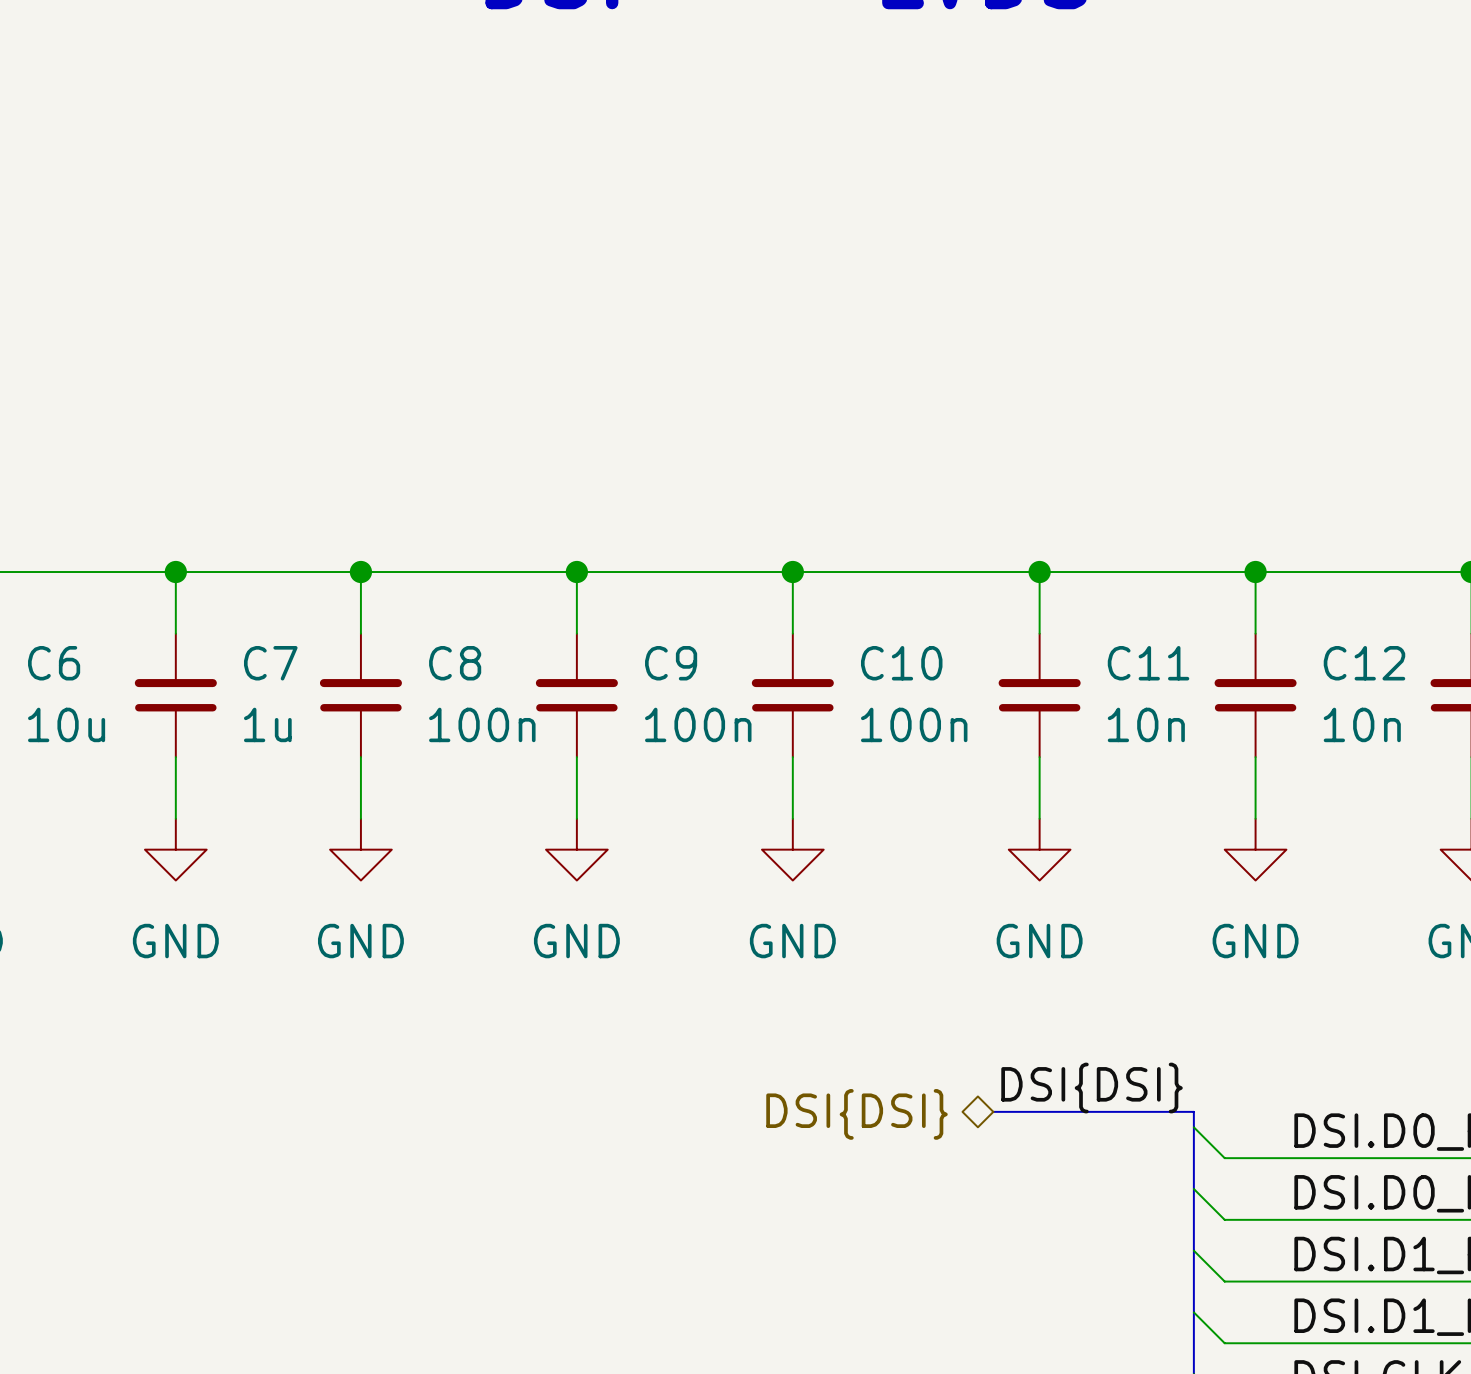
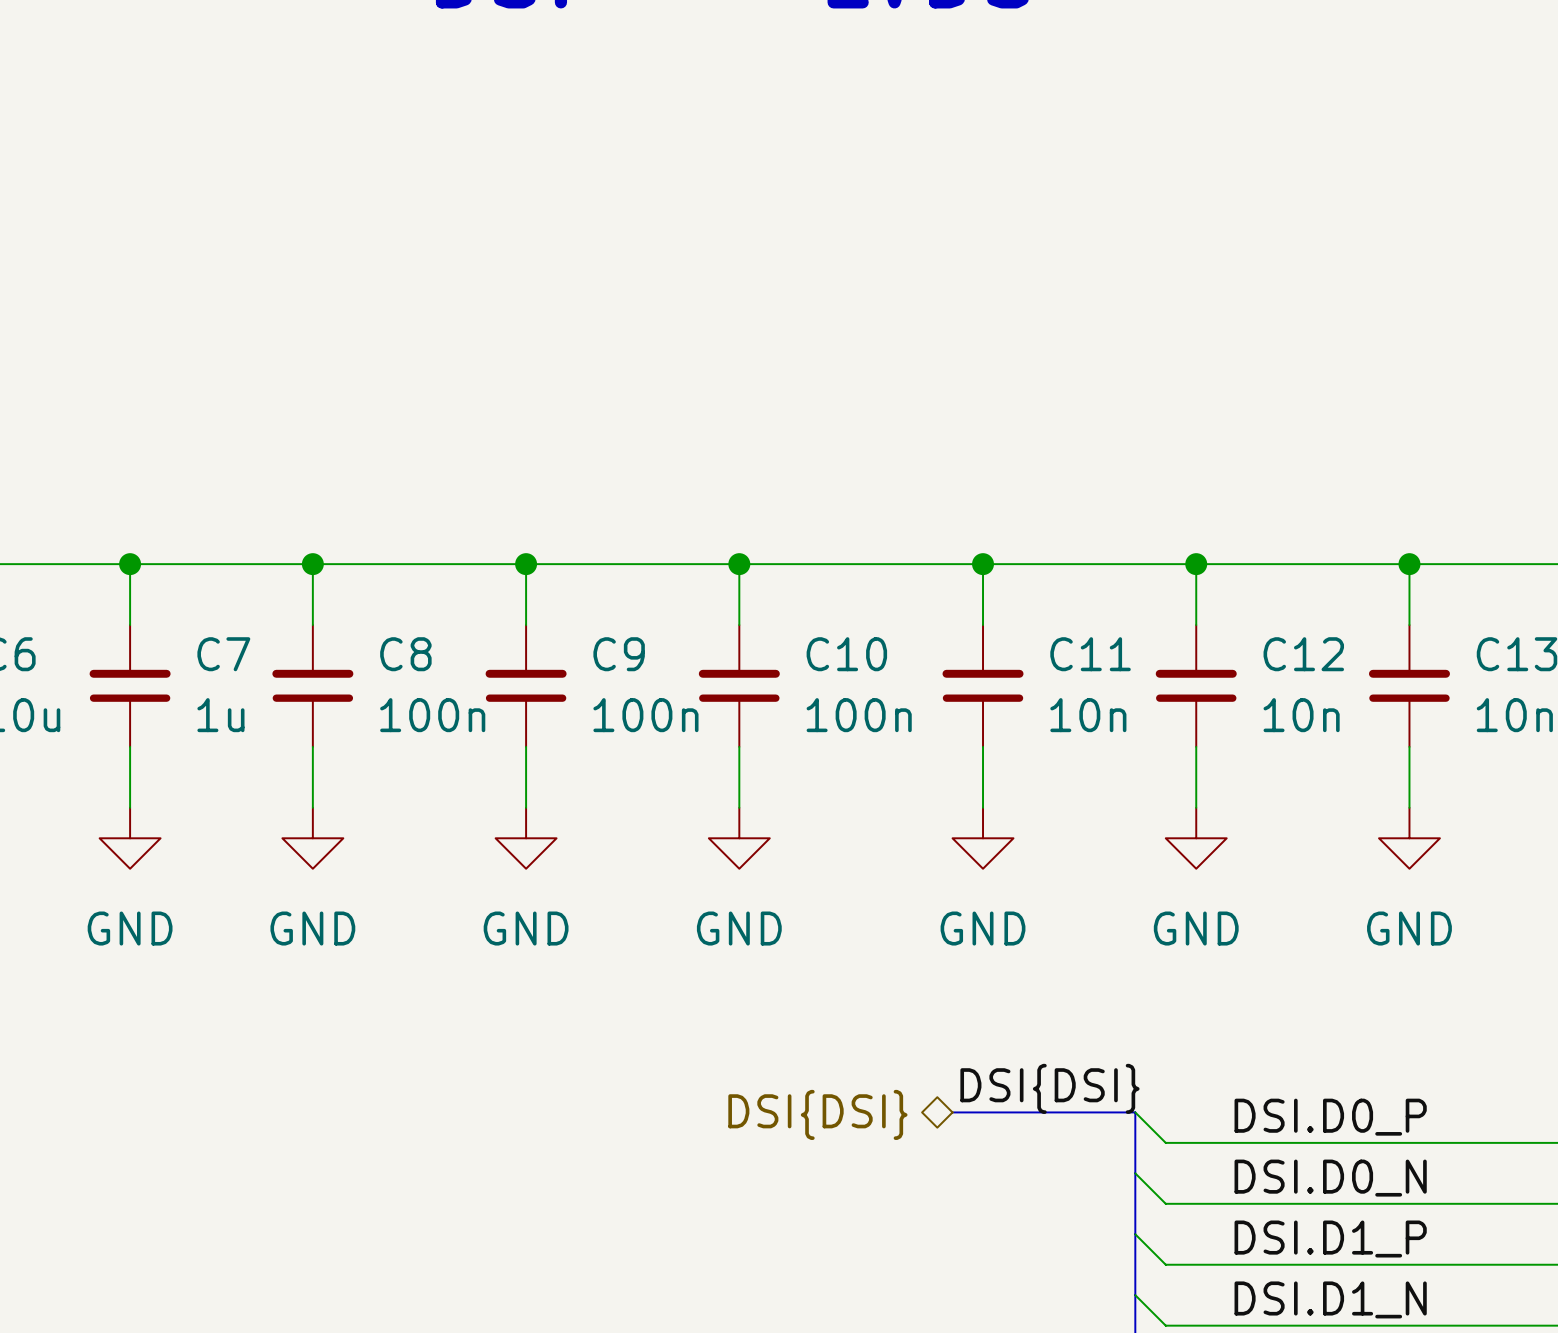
label position: DSI{DSI} (1092, 1088) -> DSI{DSI} (1049, 1088)
bus: (993, 1111) (1193, 1111) (1193, 1127) -> (952, 1112) (1135, 1112)
hierarchical label position: DSI{DSI} (856, 1114) -> DSI{DSI} (817, 1114)

